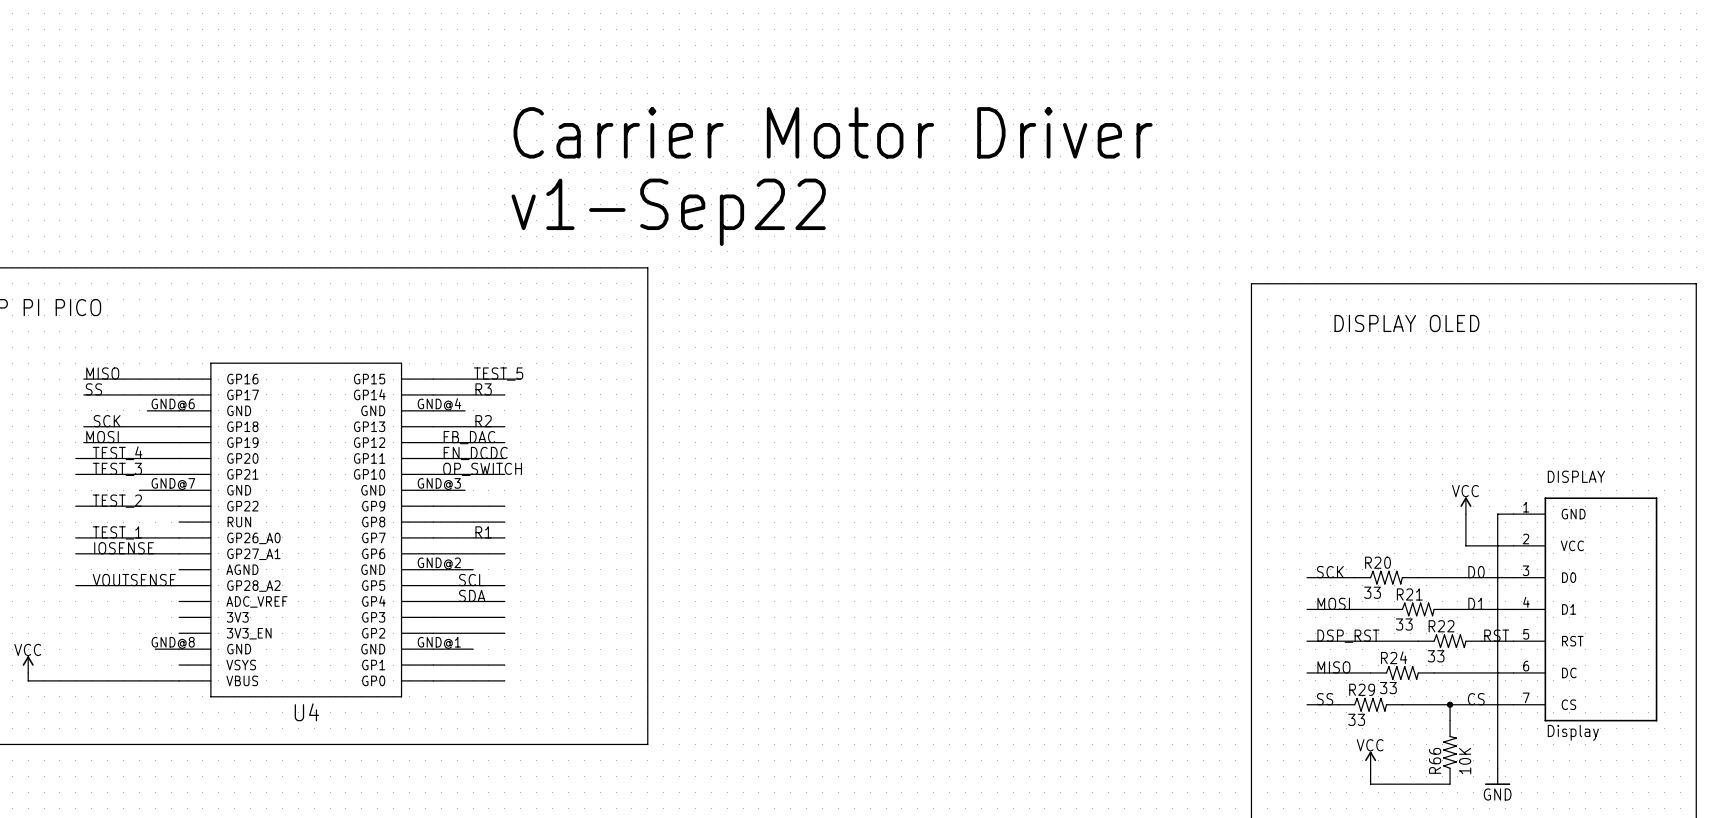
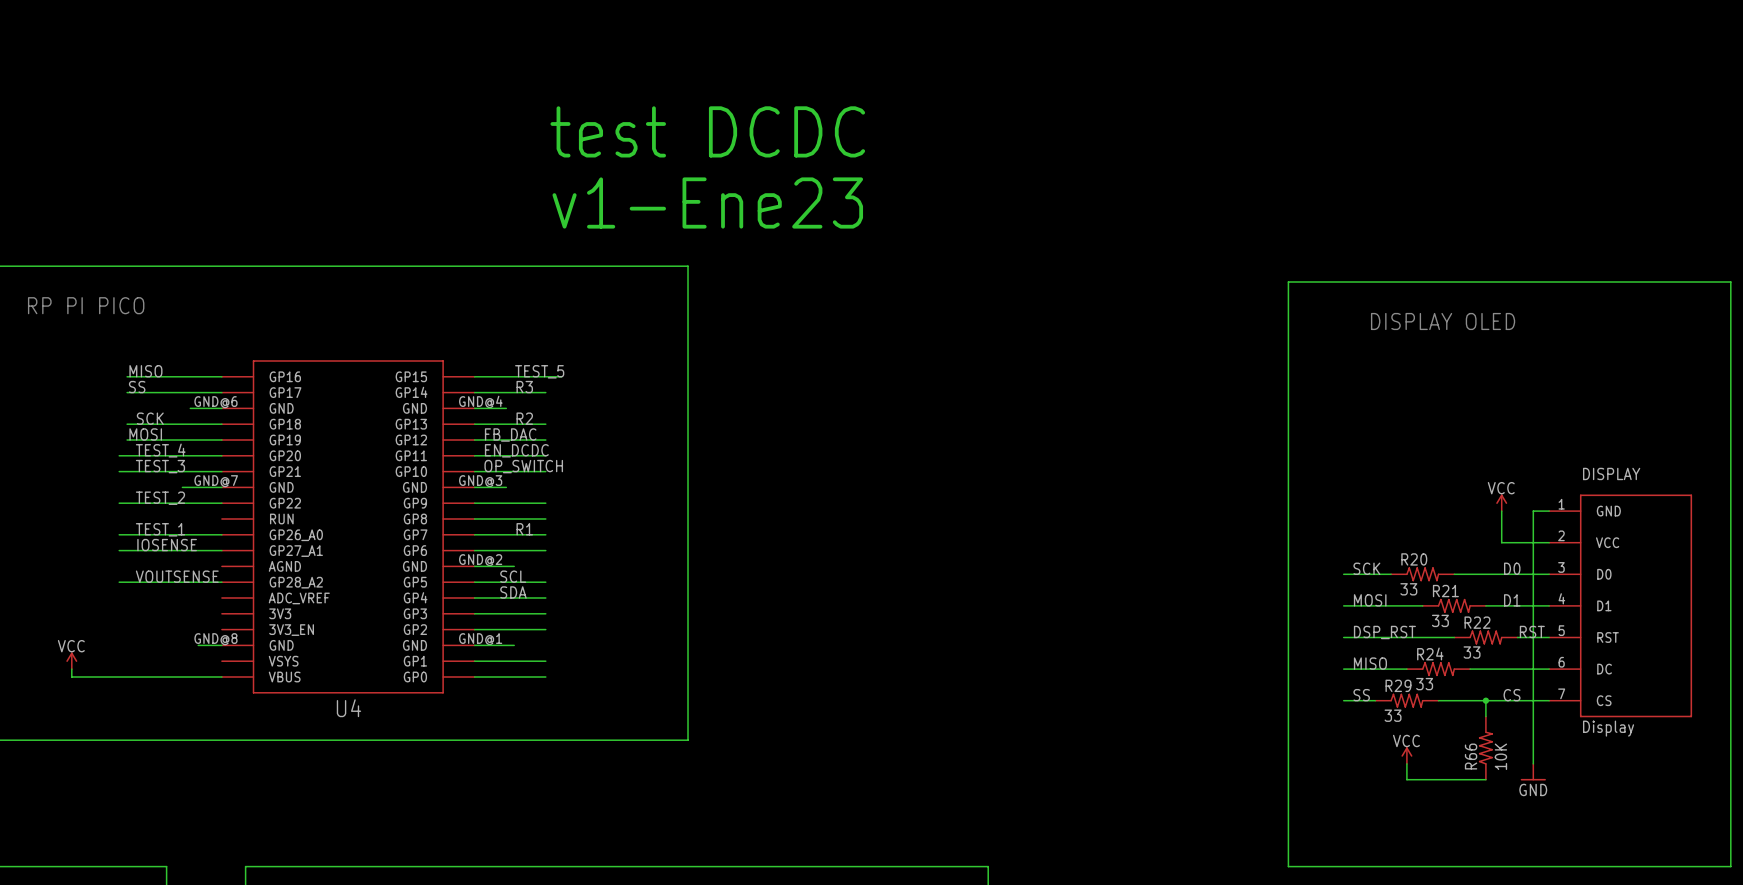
text: Carrier Motor Driver (833, 132) -> test DCDC (707, 131)
text: v1-Sep22 (668, 212) -> v1-Ene23 (707, 202)

